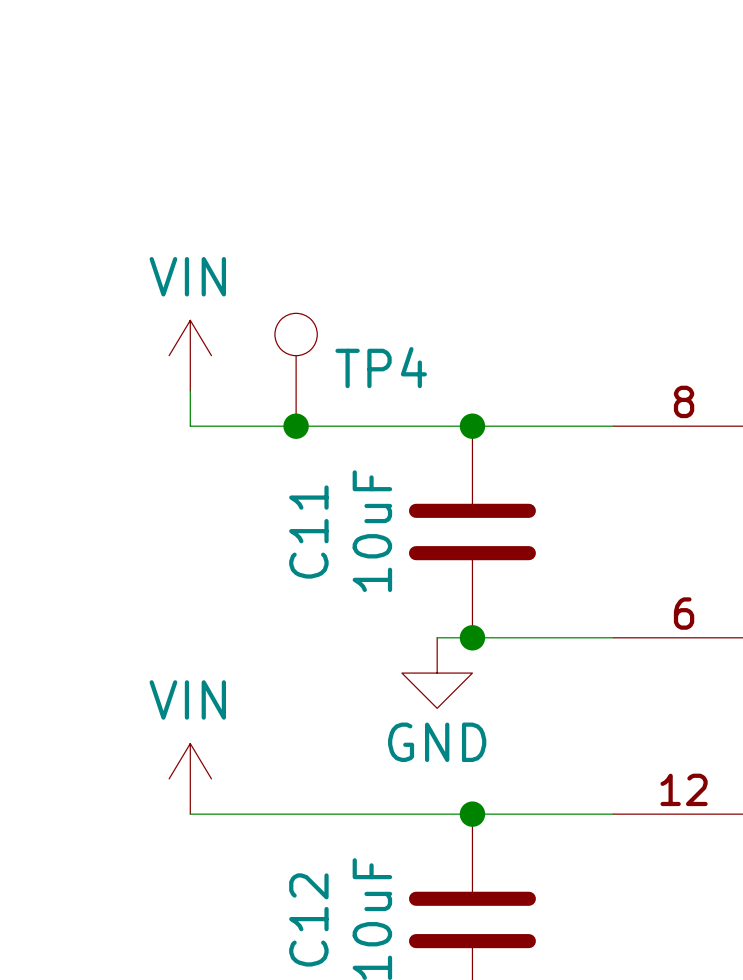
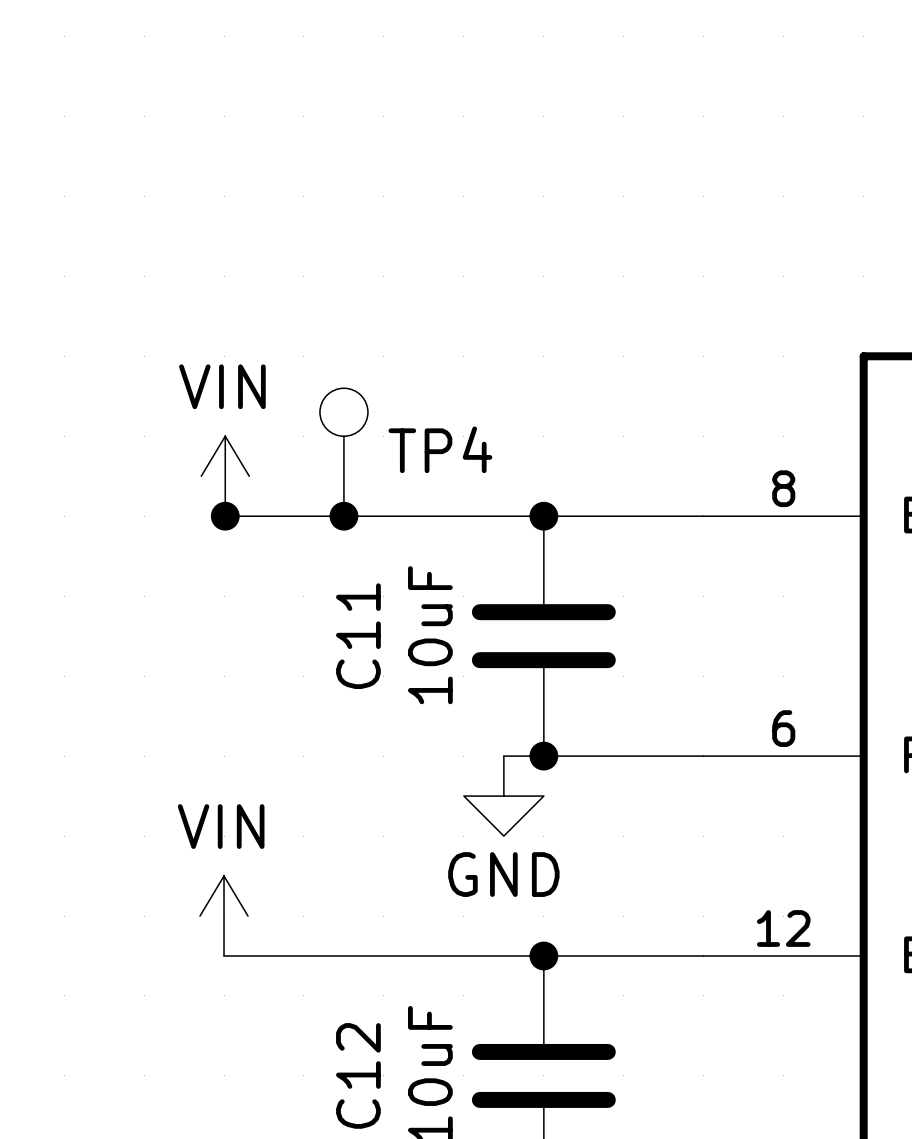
power symbol position: VIN (190, 355) -> VIN (225, 476)
wire: (190, 390) (190, 426) -> none
junction: none -> (225, 516)

